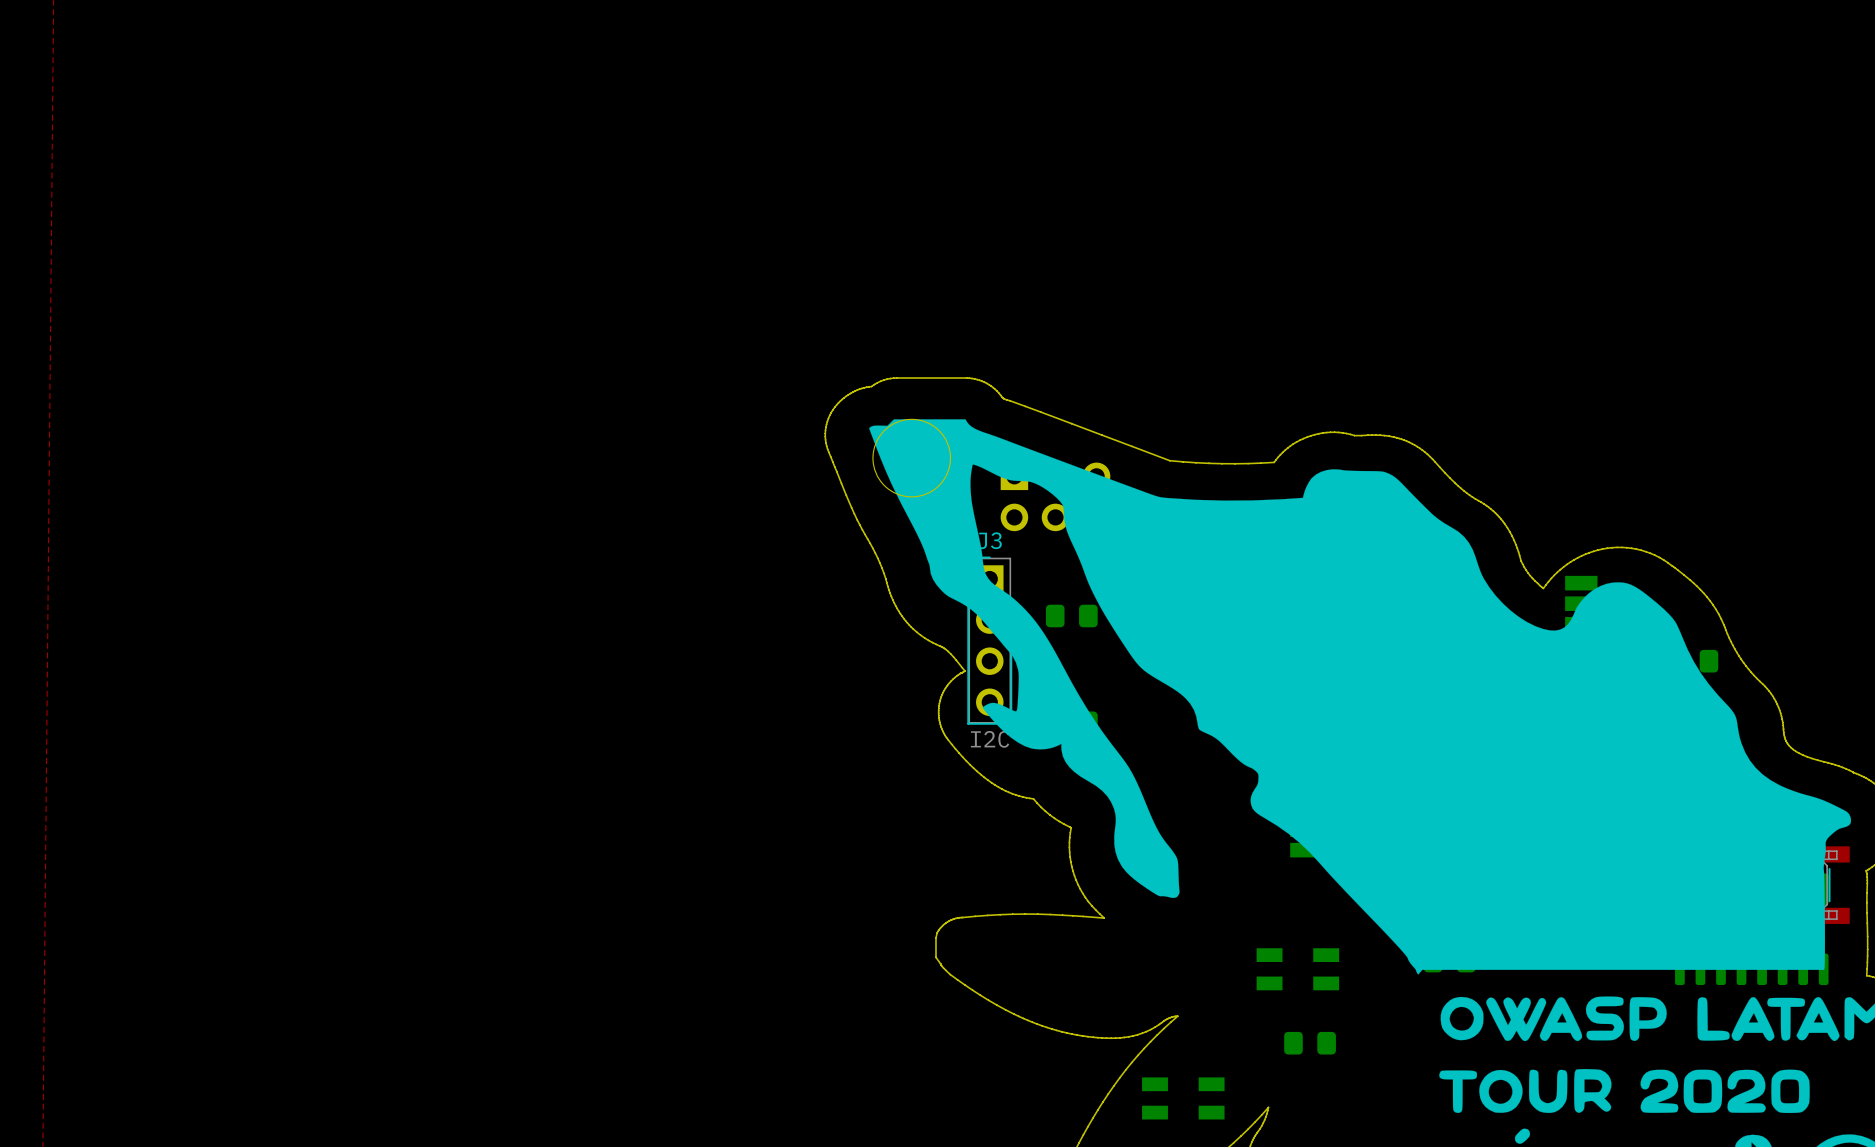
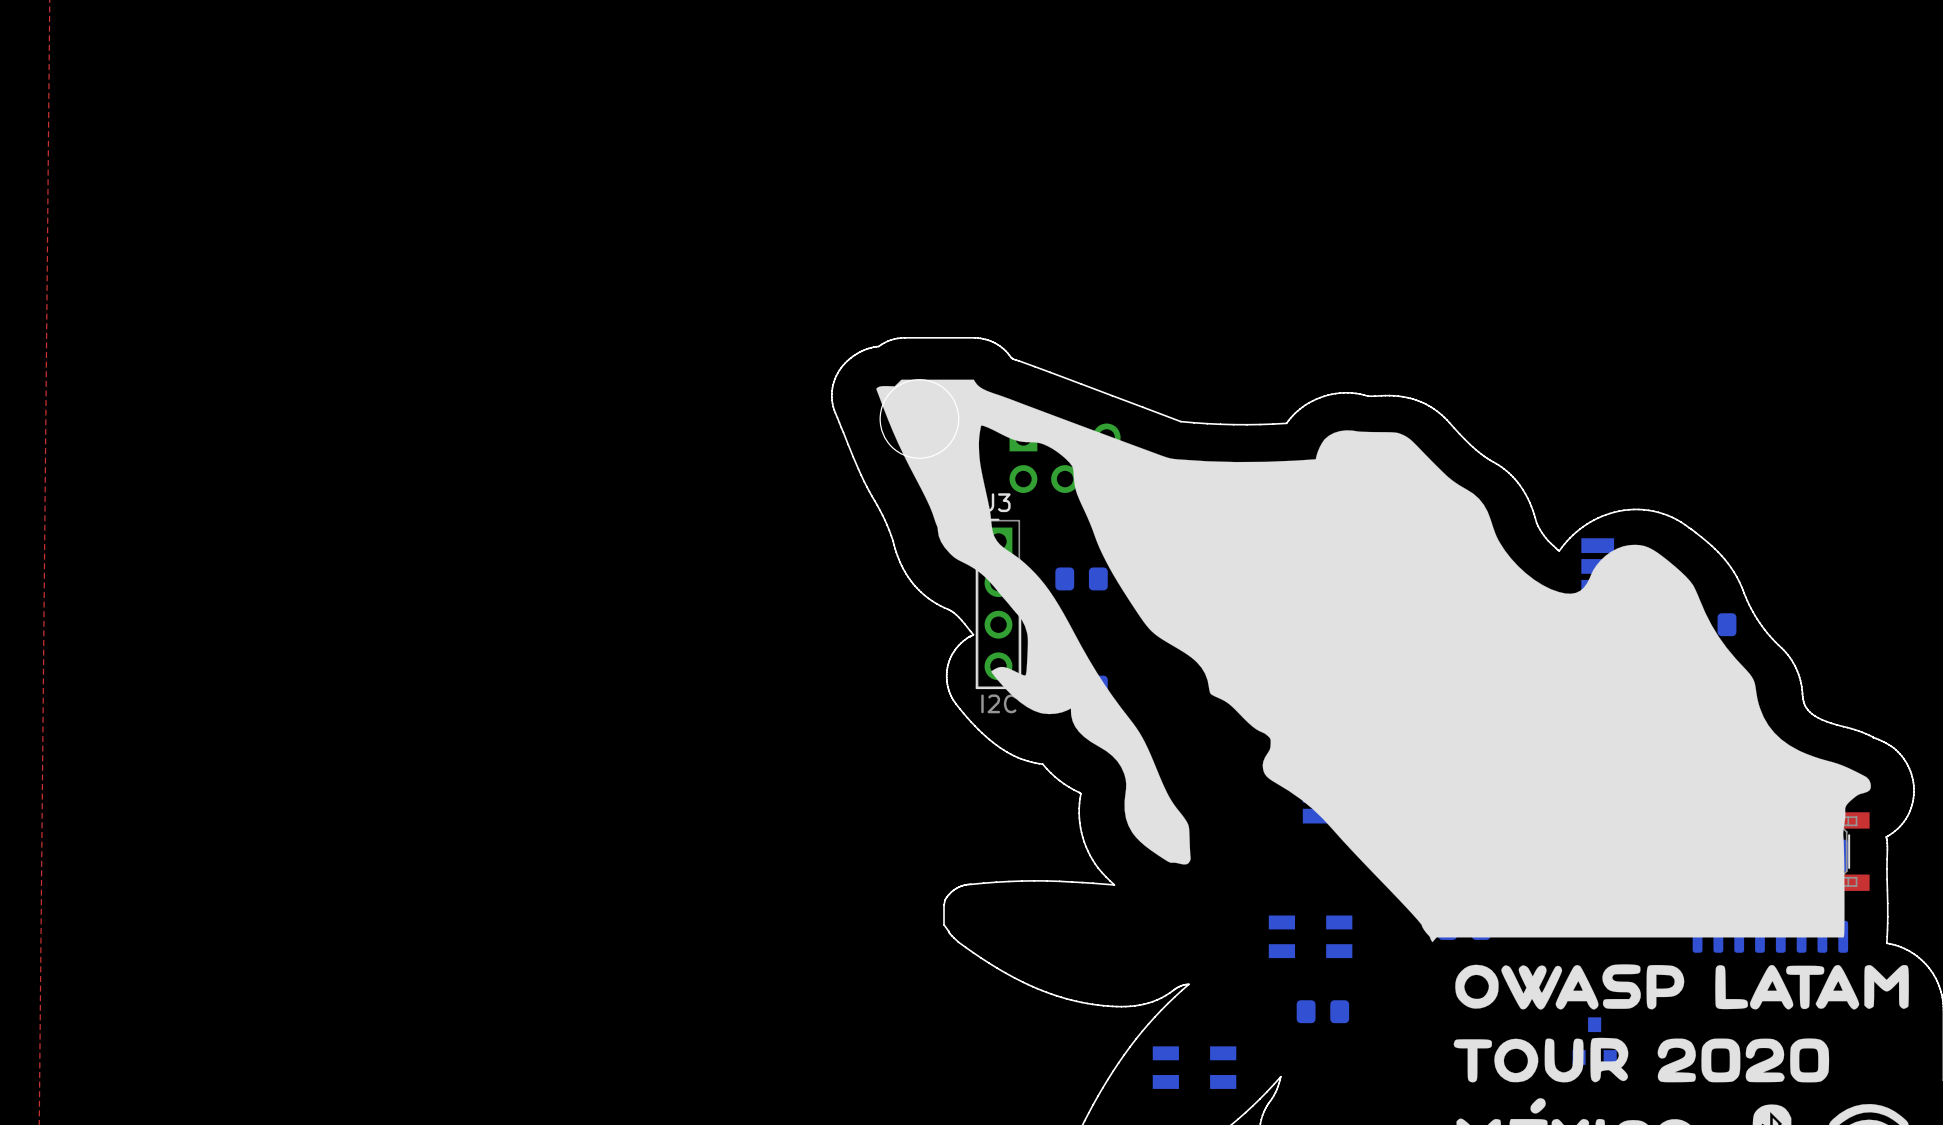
part: none -> (1594, 1041)

